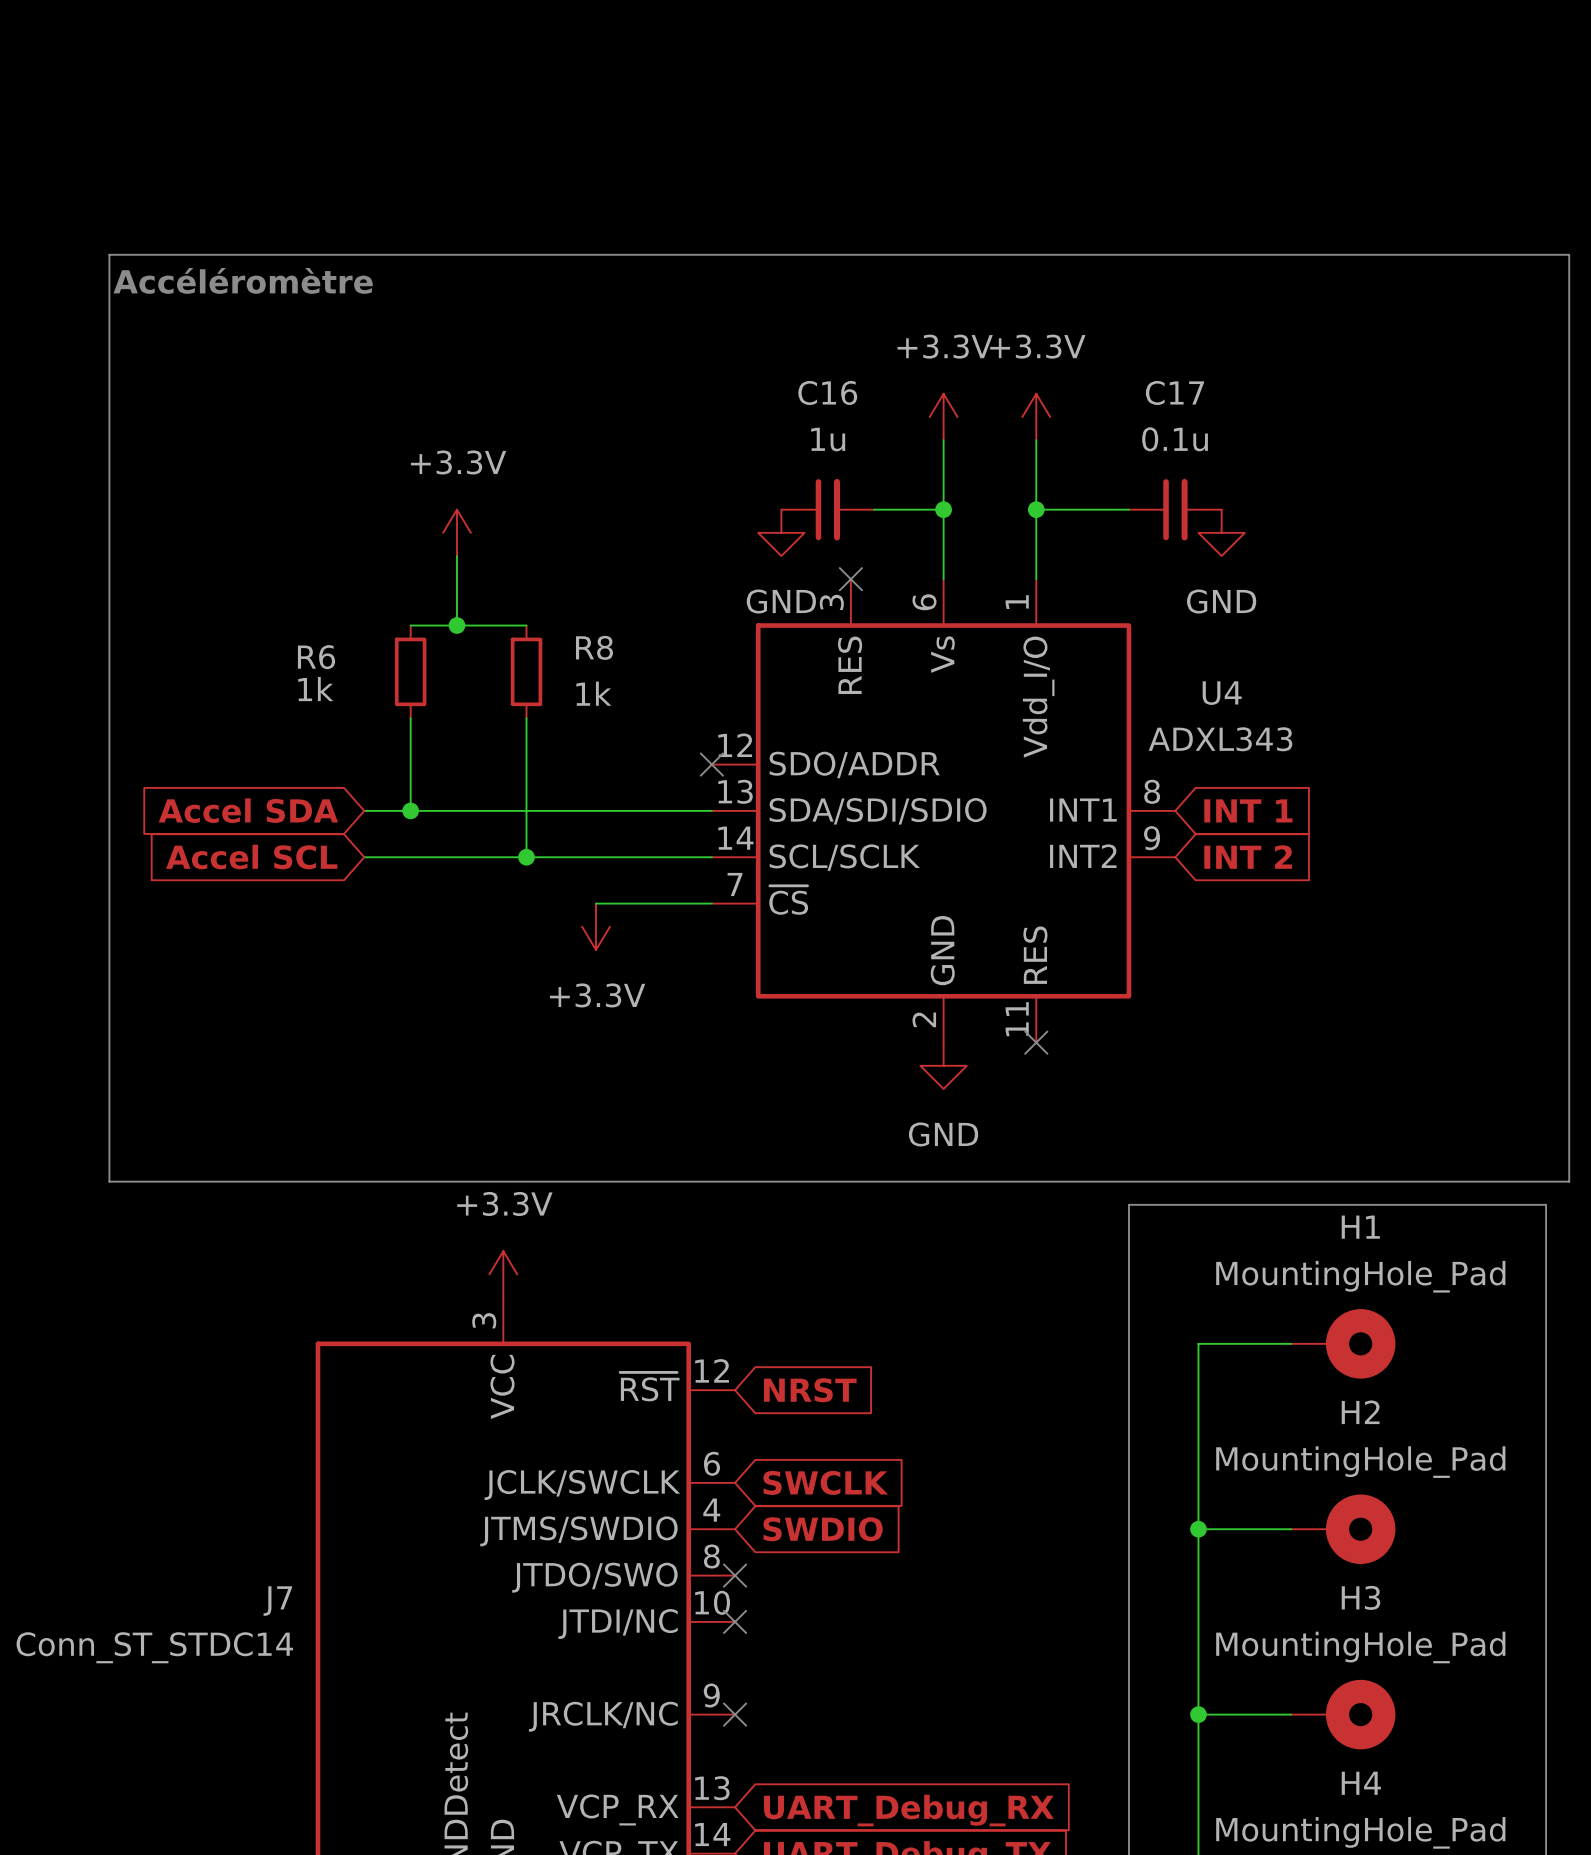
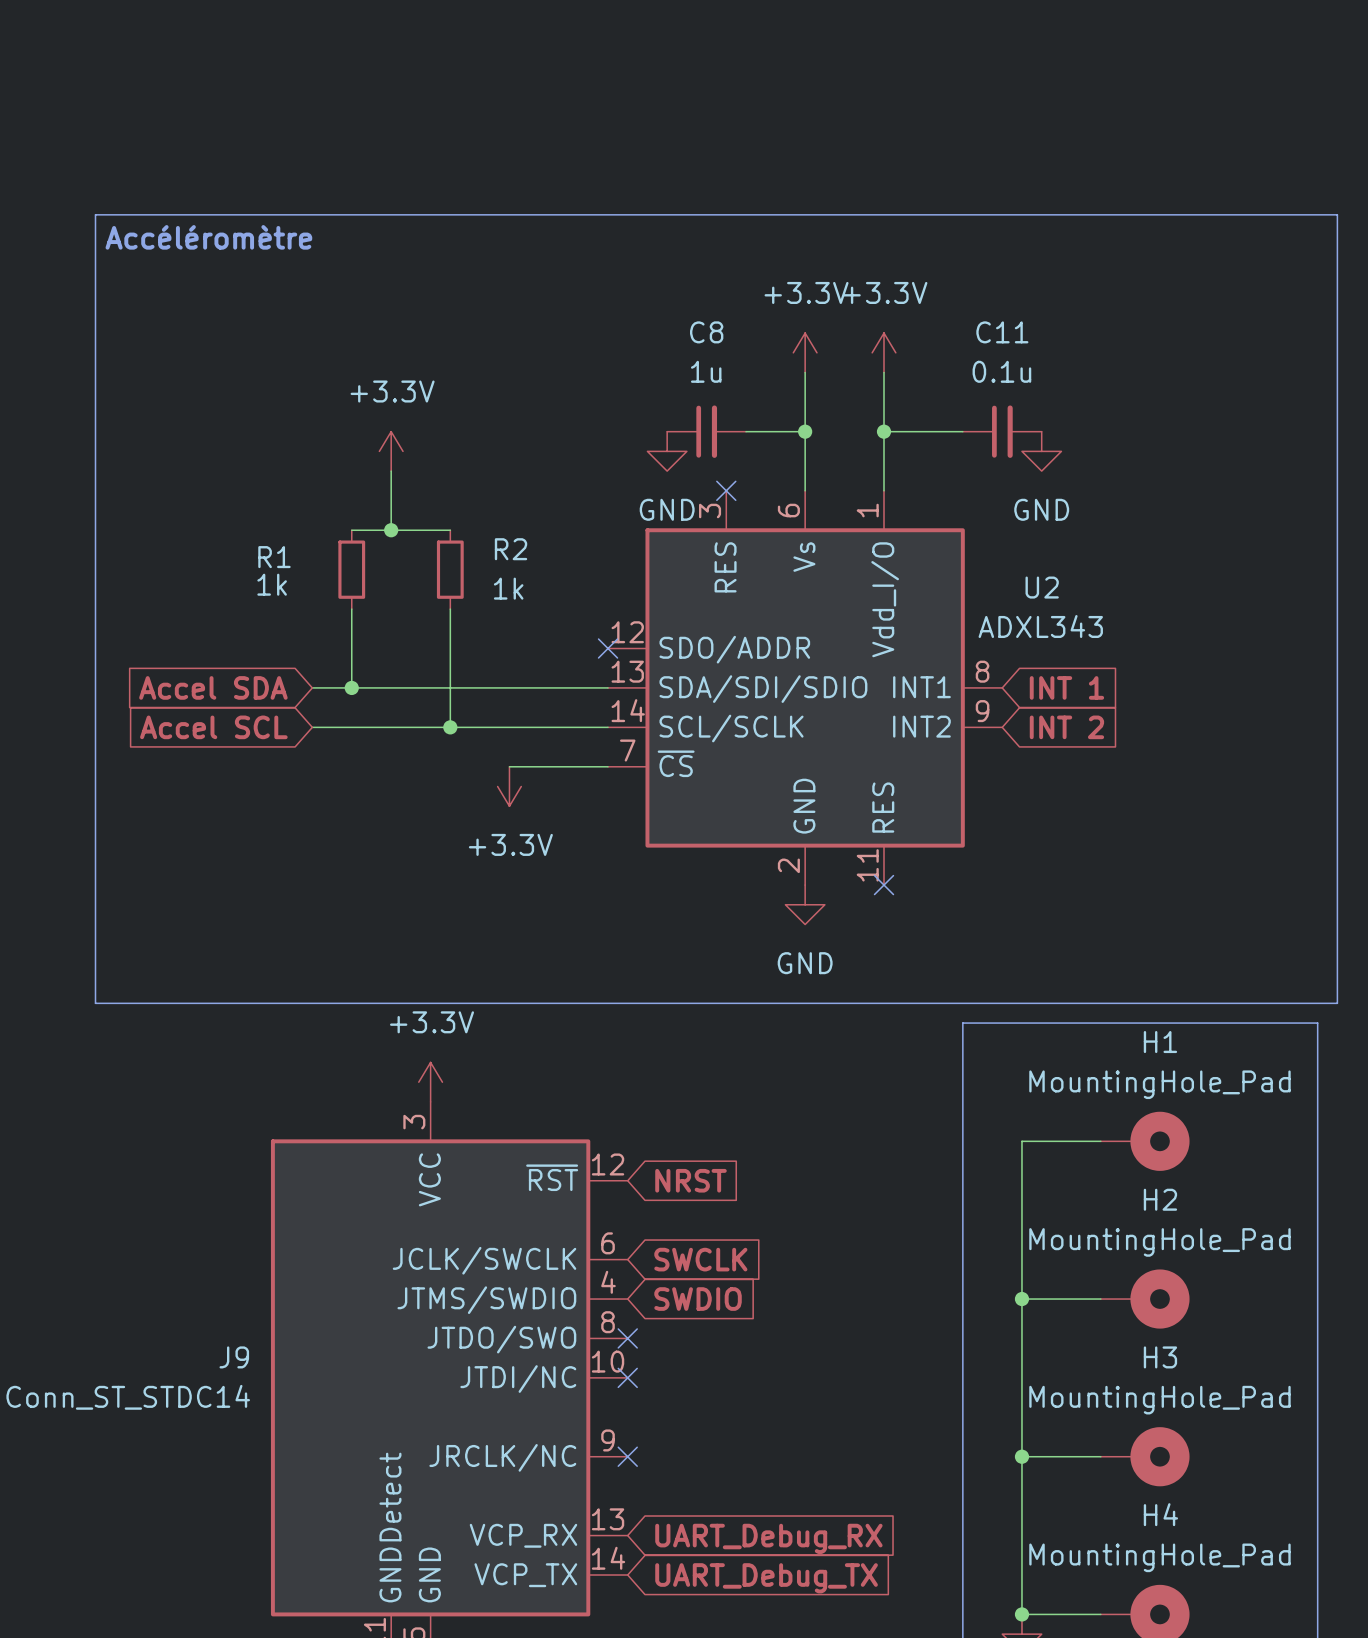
C16 name: C16 (827, 392) -> C8 (706, 332)
C17 name: C17 (1174, 392) -> C11 (1002, 332)
R8 name: R8 (594, 647) -> R2 (511, 549)
R6 name: R6 (316, 657) -> R1 (274, 557)
U4 name: U4 (1222, 693) -> U2 (1042, 587)
J7 name: J7 (277, 1601) -> J9 (234, 1357)

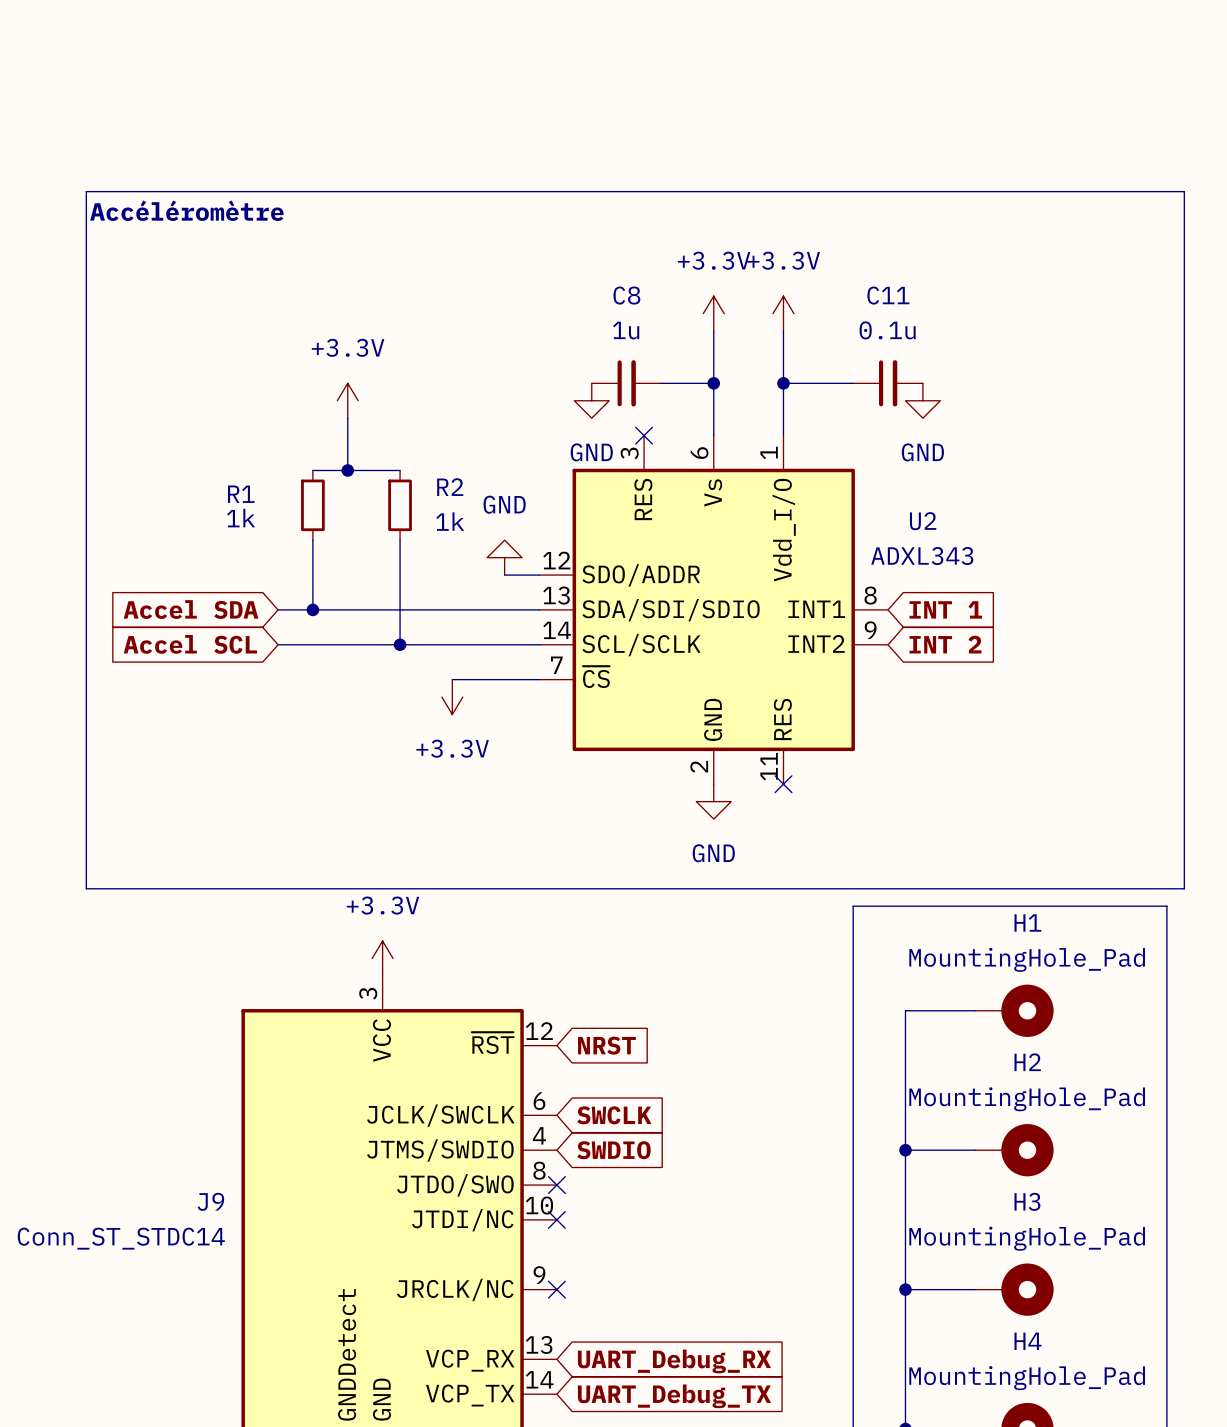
power symbol: none -> GND (504, 557)
wire: none -> (504, 575) (539, 575)
no-connect mark: (608, 648) -> none

